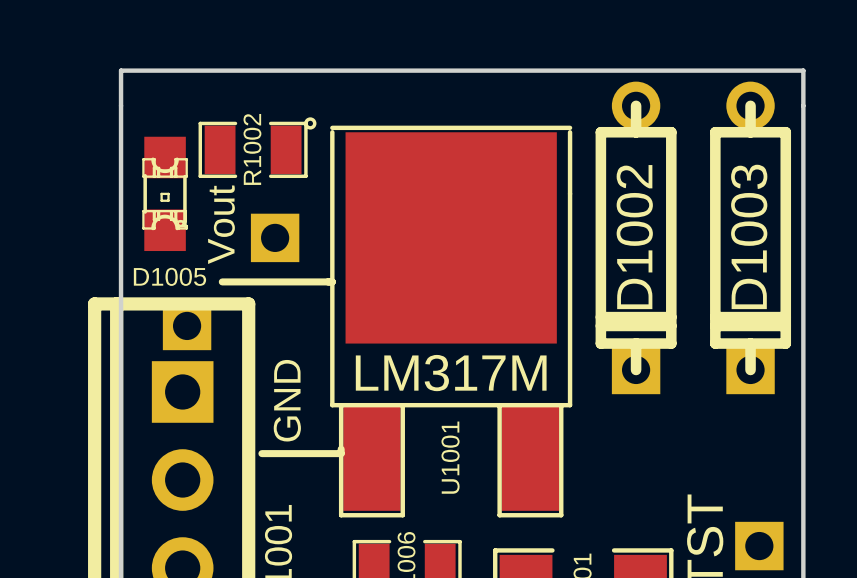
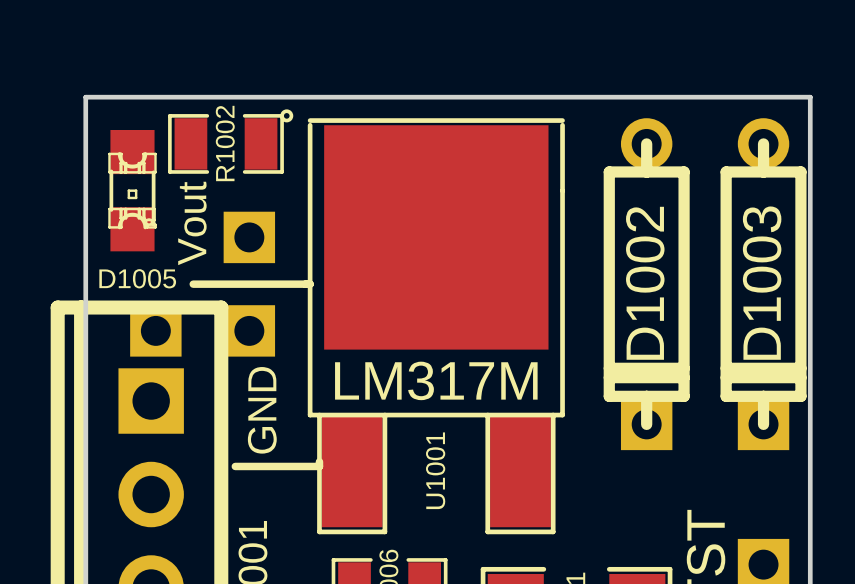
board edge: (121, 105) (121, 70) (803, 70) (803, 105) -> (85, 97) (810, 97)
D1002 position: (636, 237) -> (646, 284)
D1003 position: (750, 237) -> (763, 284)
part: none -> (249, 330)

